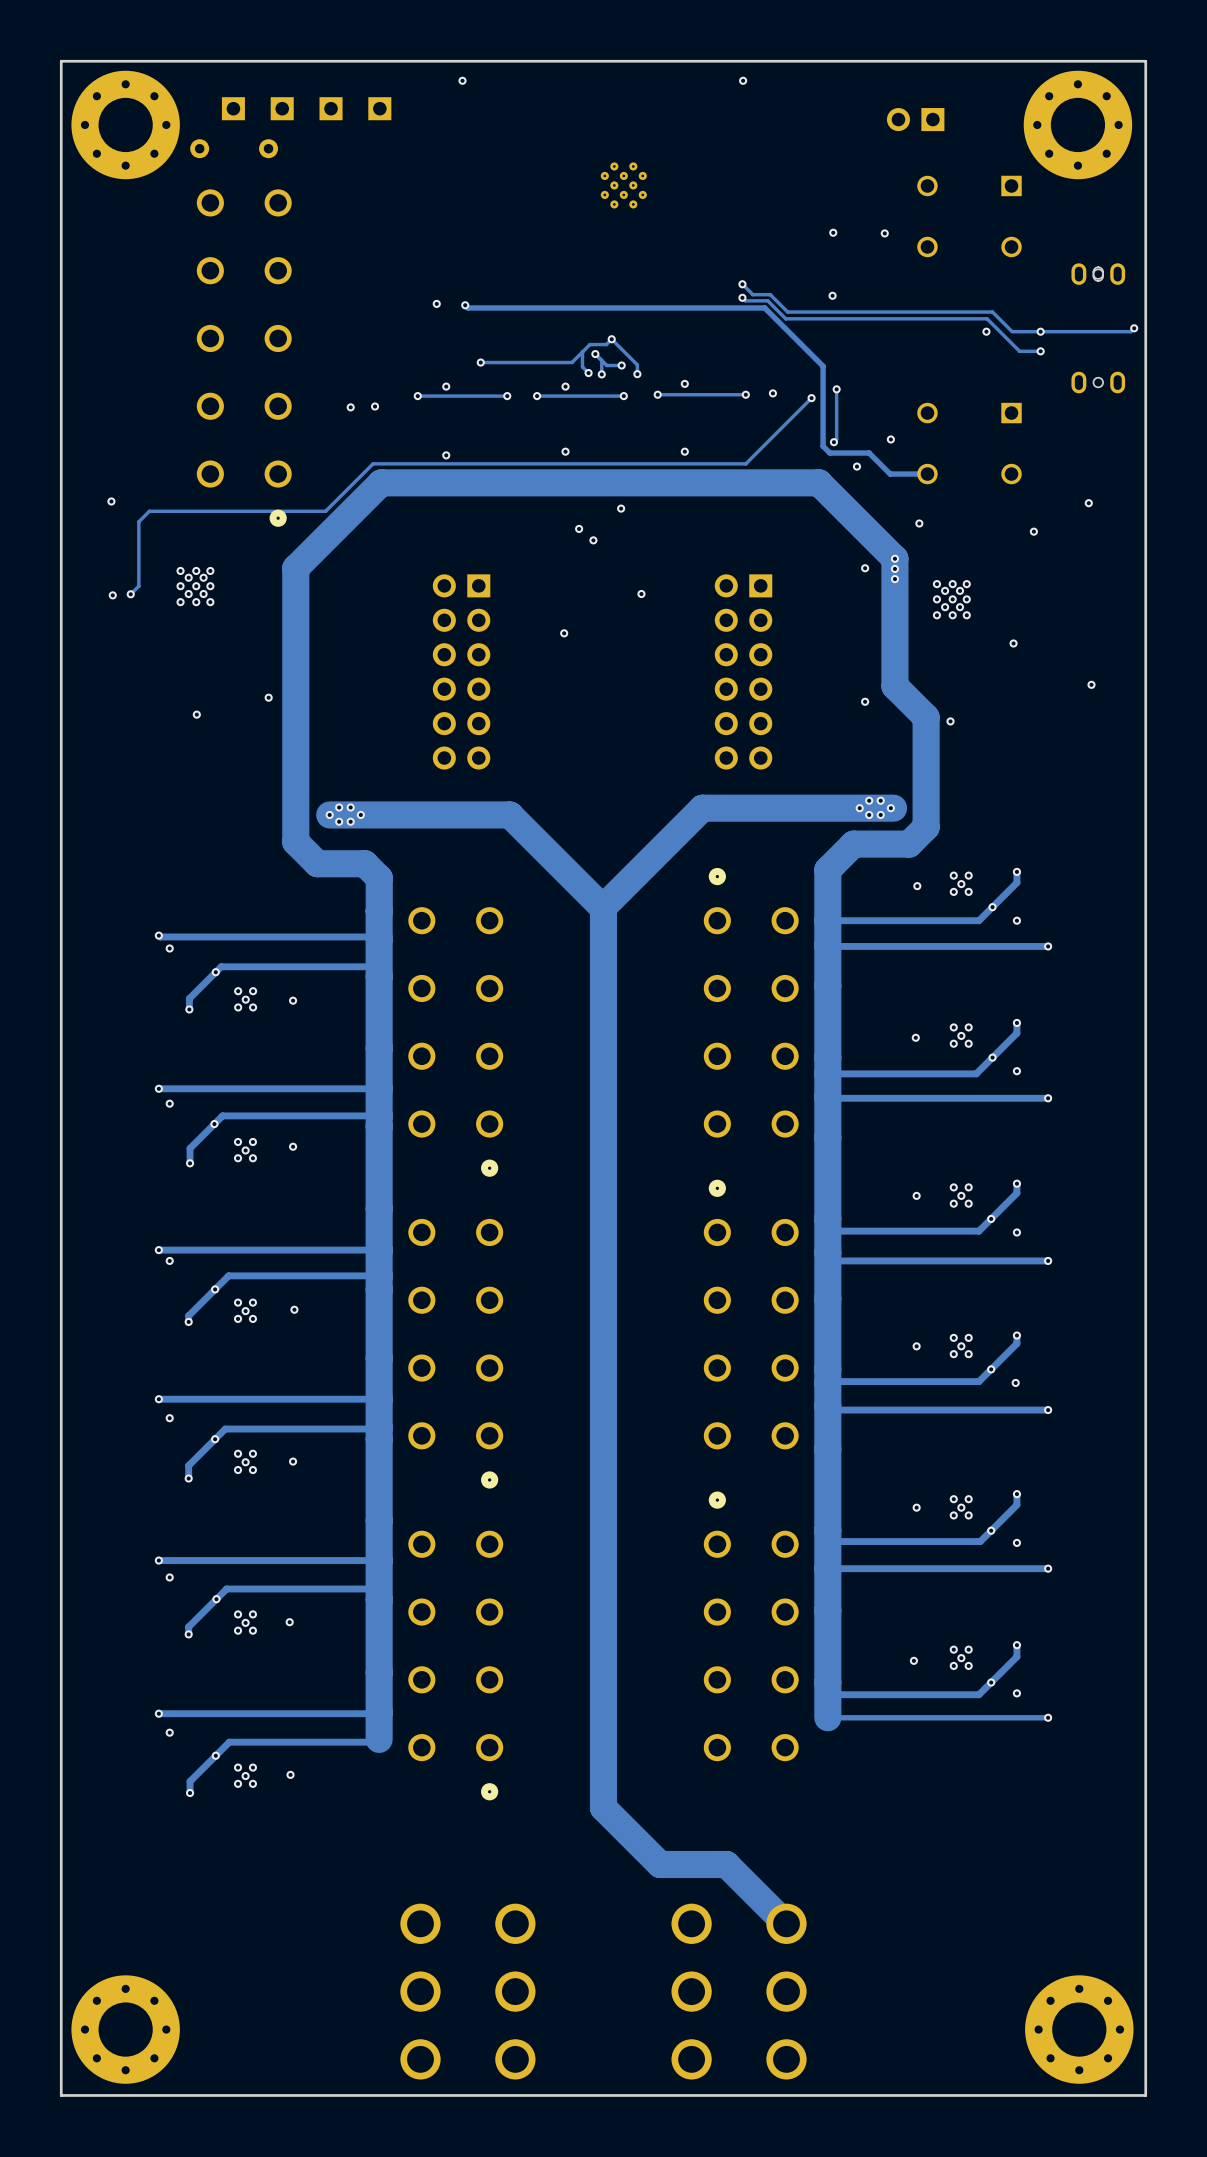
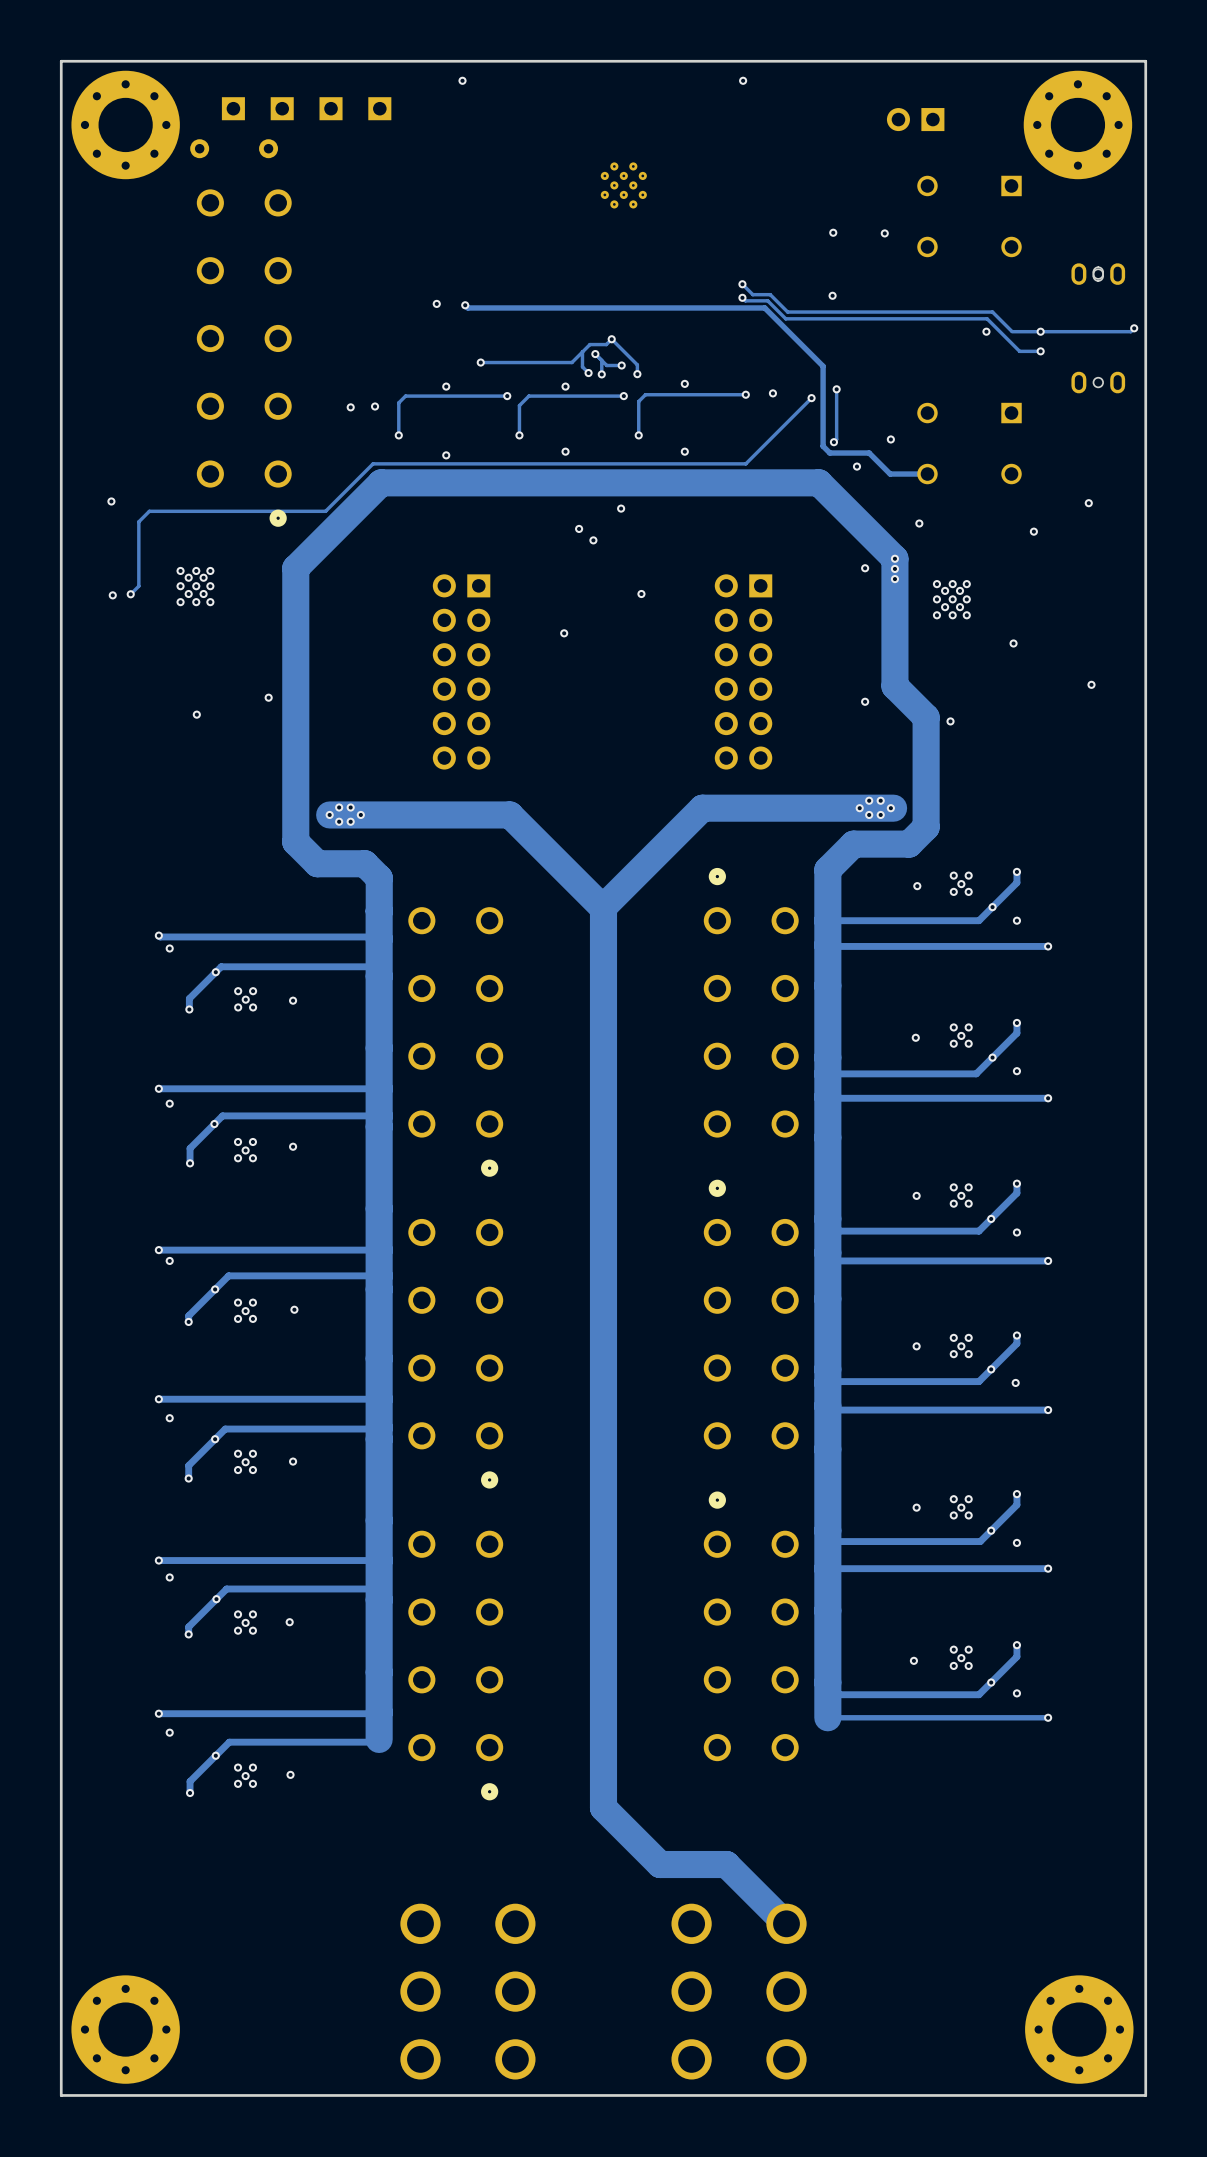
track: none -> (657, 394) (645, 394) (638, 401) (638, 435)
via position: (657, 394) -> (638, 435)
track: none -> (417, 396) (405, 396) (398, 402) (398, 435)
via position: (417, 396) -> (398, 435)
track: none -> (537, 396) (528, 396) (519, 405) (519, 435)
via position: (537, 396) -> (519, 435)

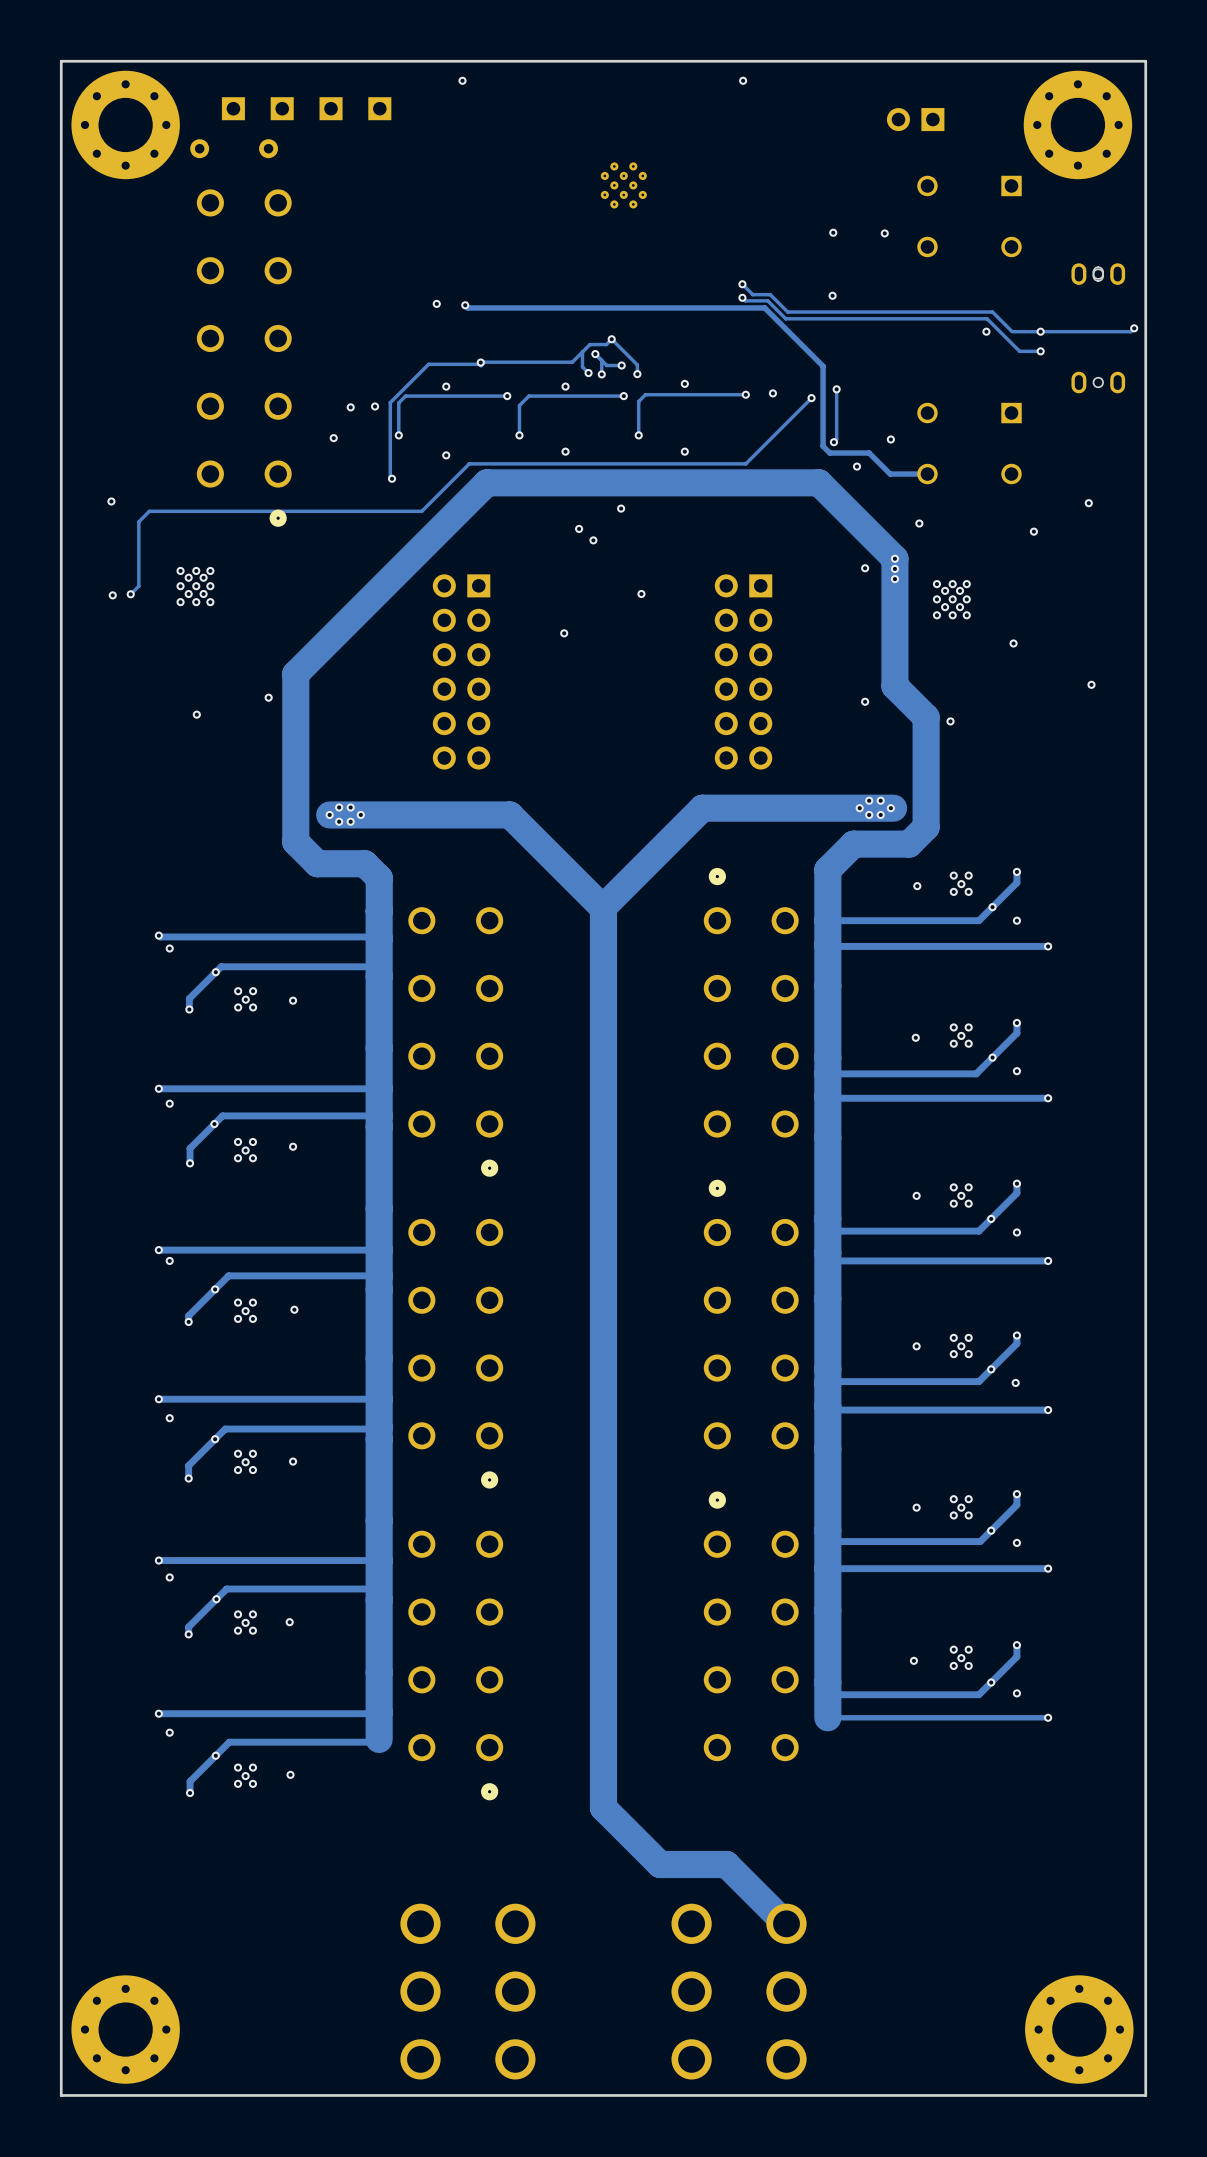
track: (572, 362) (480, 362) -> (572, 362) (484, 362) (480, 365) (428, 364) (390, 402) (390, 477) (392, 478)
via: none -> (333, 438)
track: (469, 463) (373, 463) (325, 511) -> (469, 463) (421, 511) (325, 511)
via: none -> (392, 478)
track: (486, 482) (381, 482) (295, 568) (295, 673) -> (486, 482) (295, 673)

